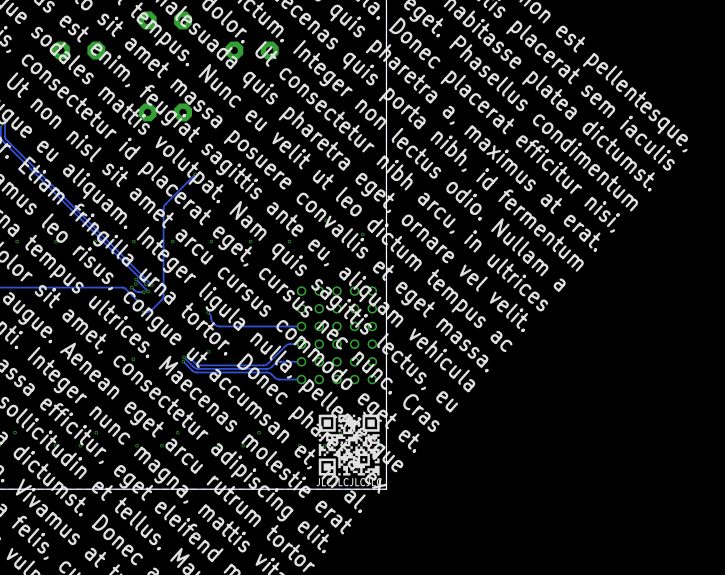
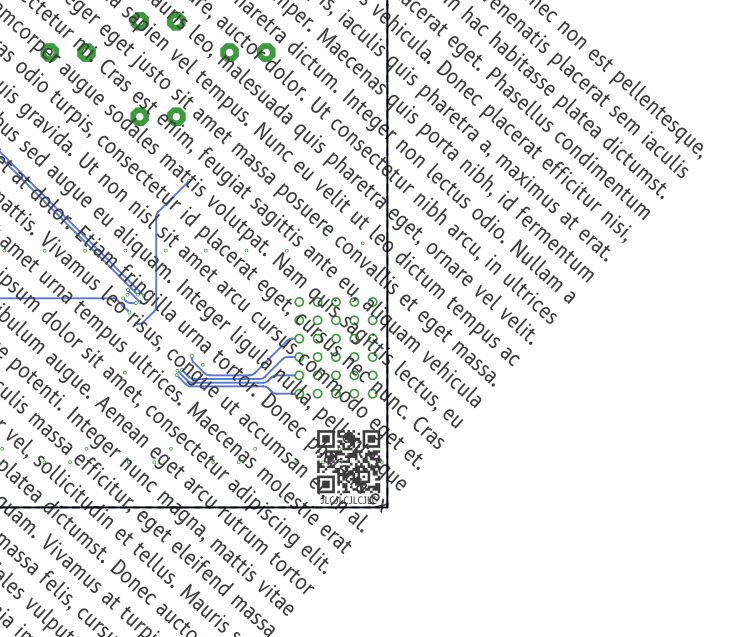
track: (208, 312) (212, 322) (218, 326) (294, 326) -> (191, 356) (192, 361) (207, 375) (250, 375) (287, 340) (292, 338)
via: (208, 312) -> none
via: none -> (191, 356)

